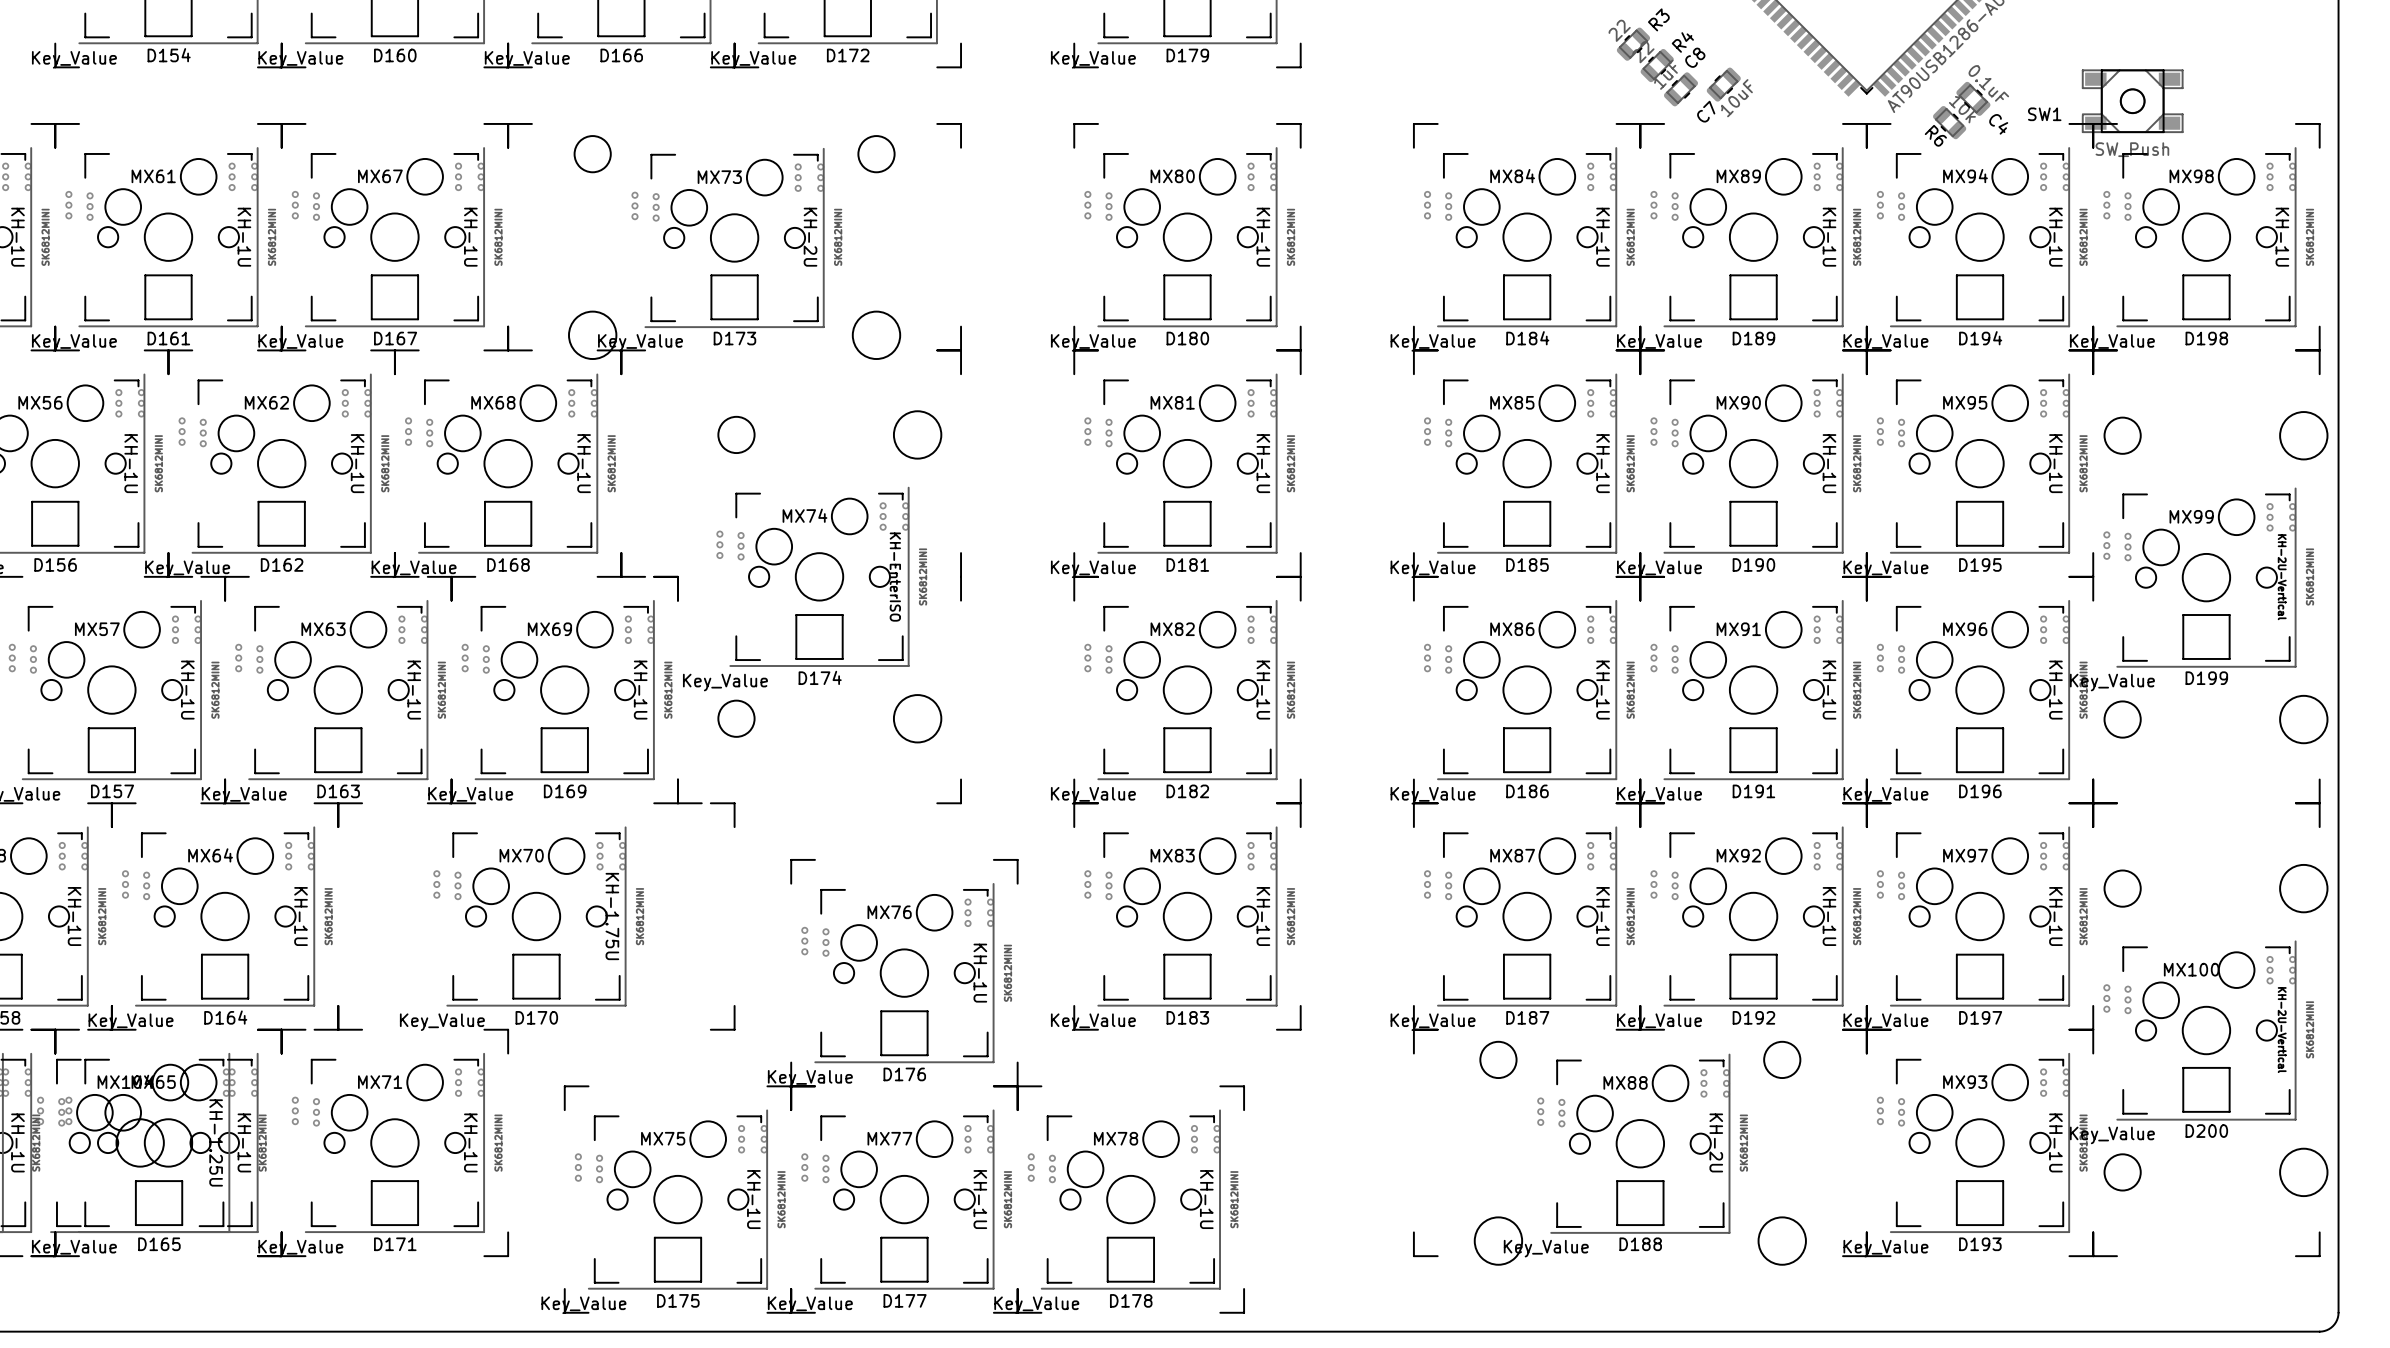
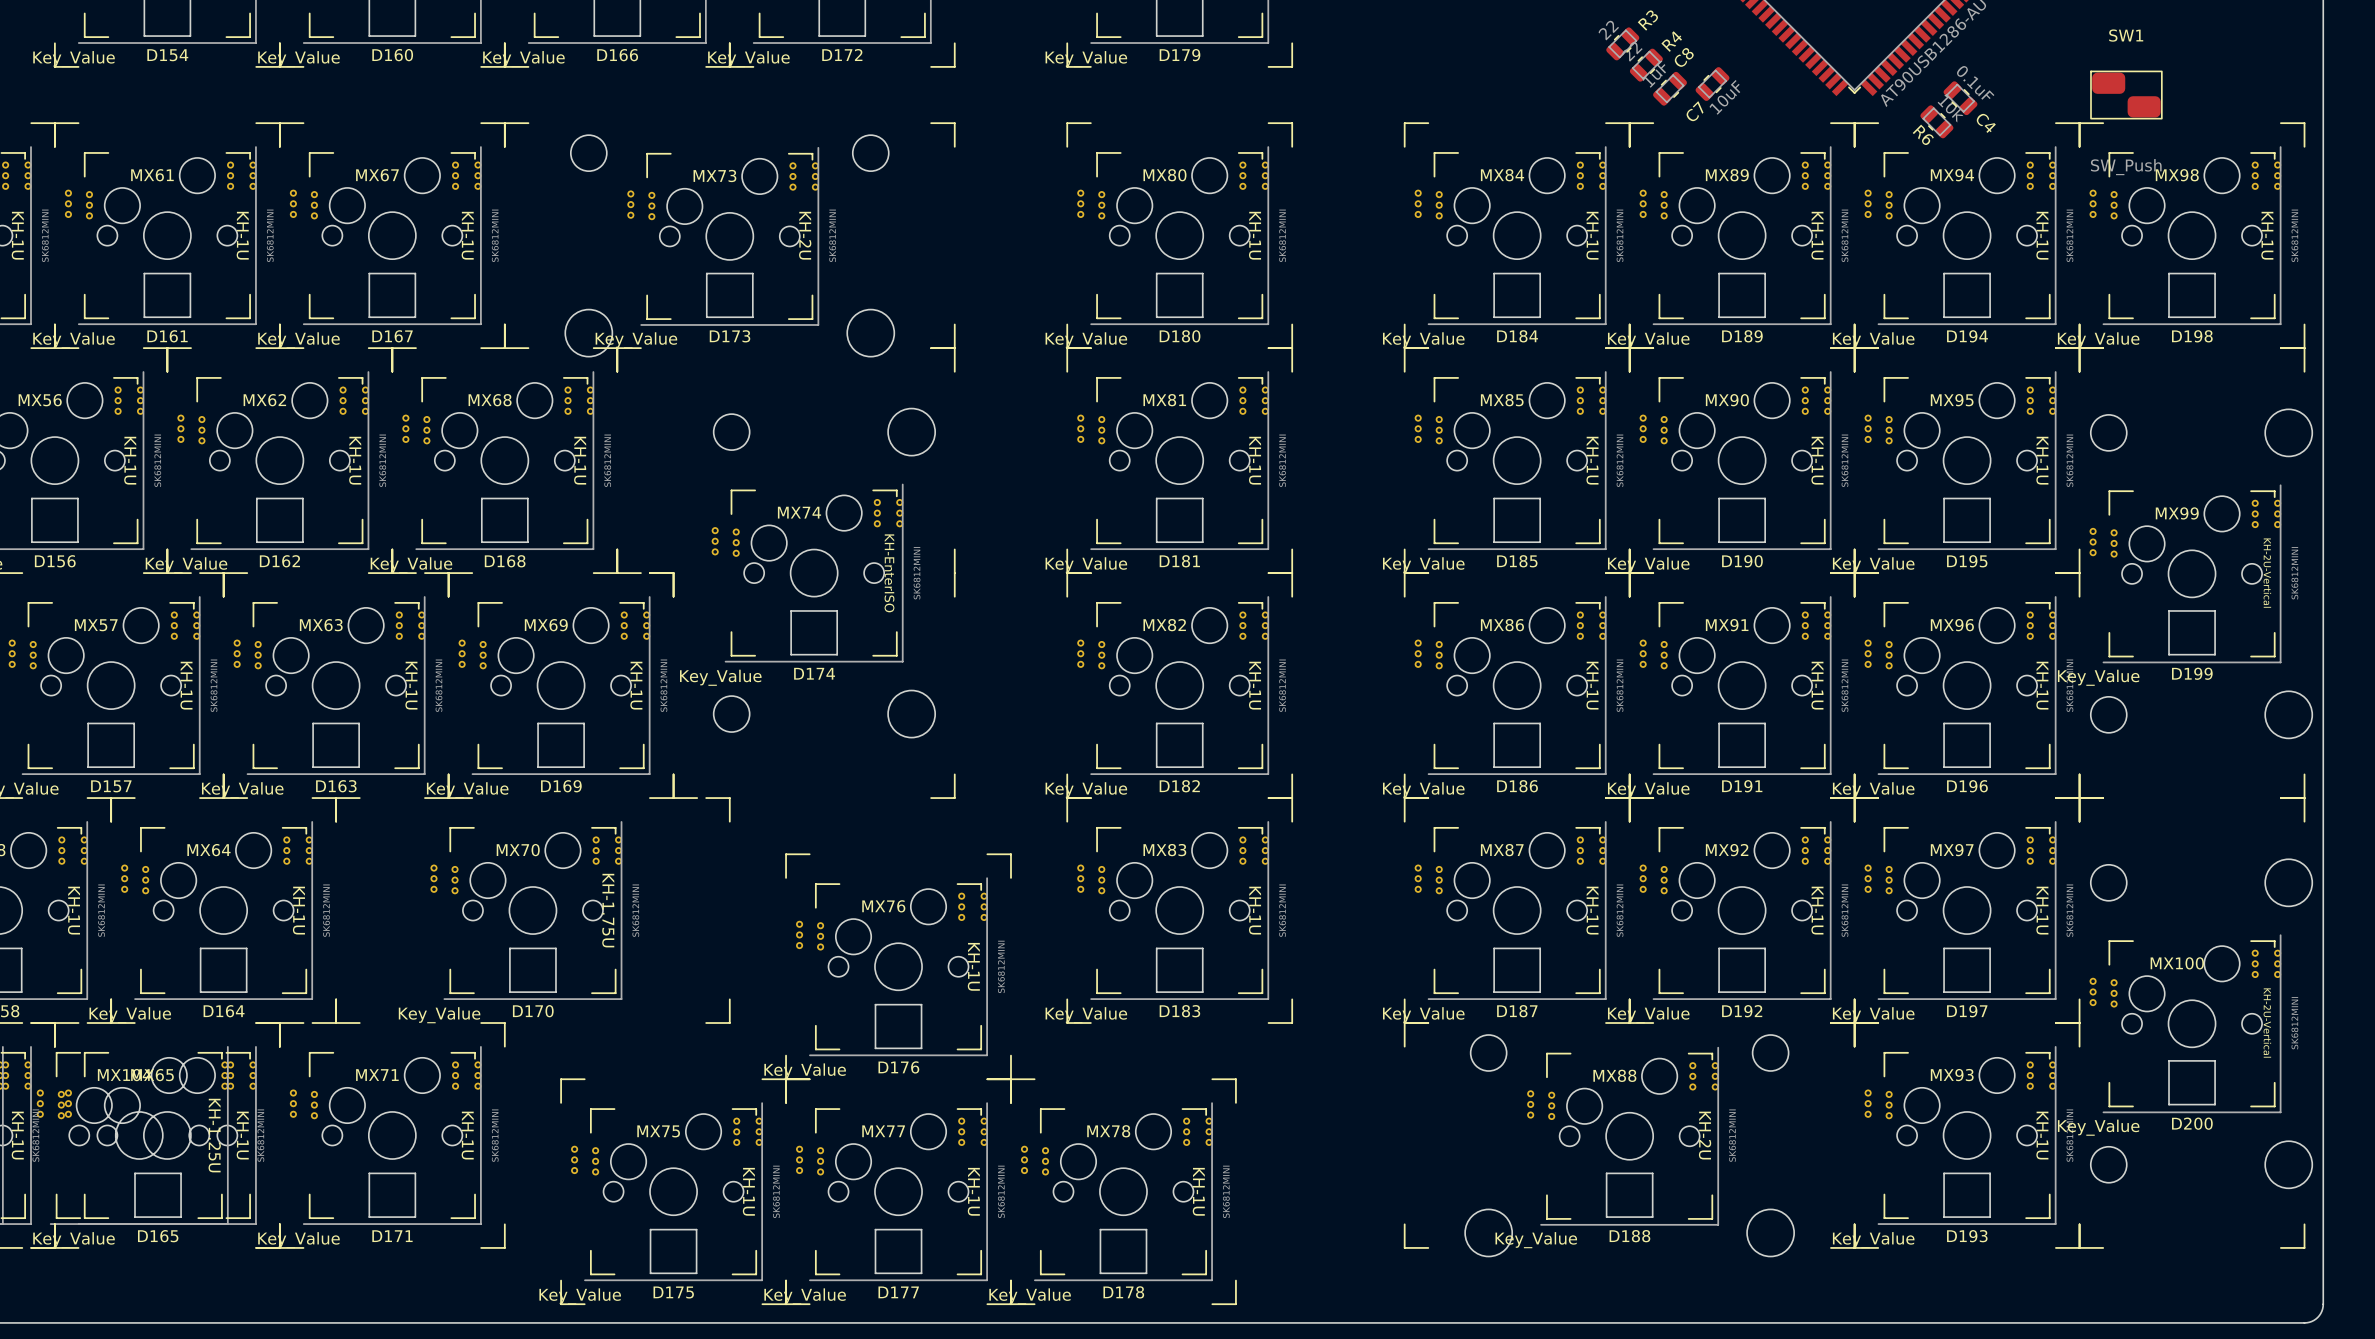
SW1 footprint: [2081, 69, 2184, 134] -> [2090, 70, 2163, 120]
SW1 name position: SW1 (2044, 114) -> SW1 (2126, 35)

